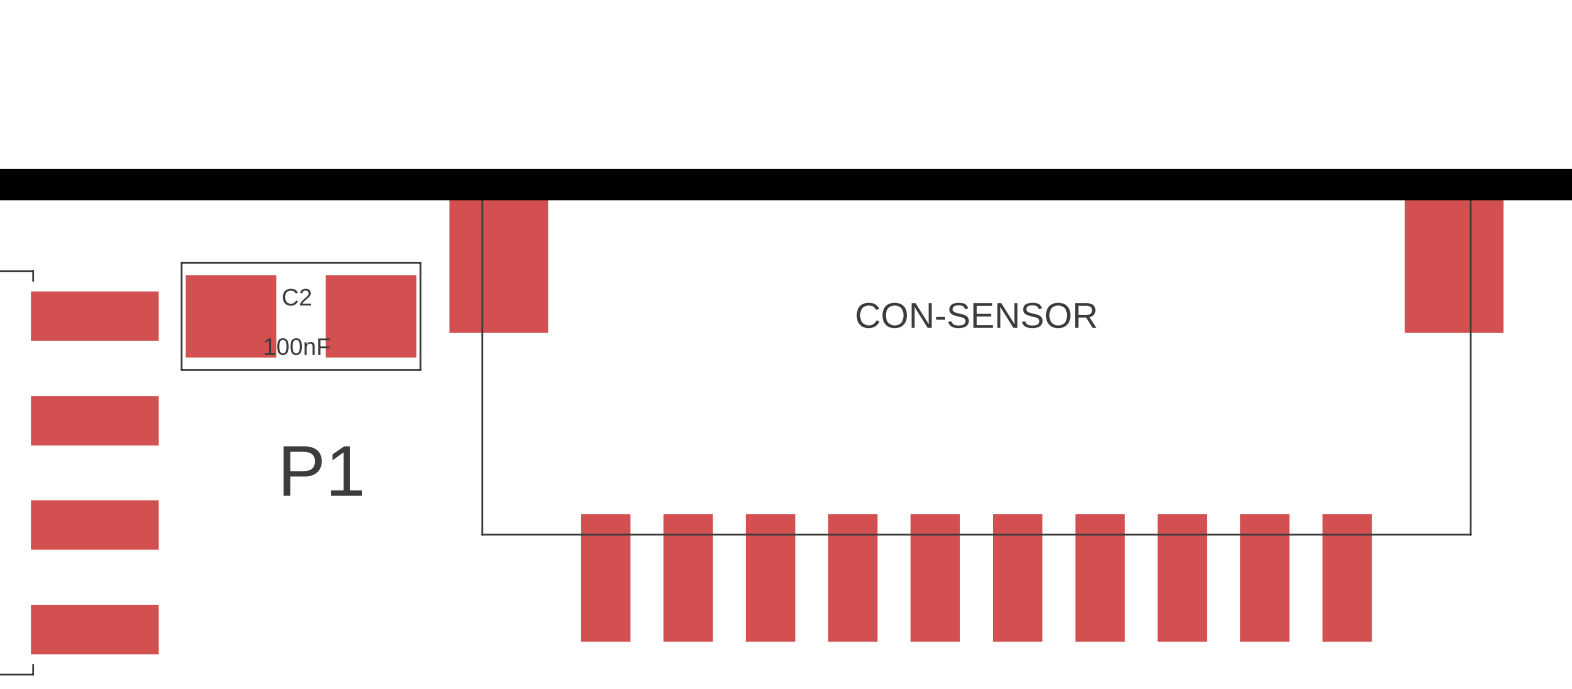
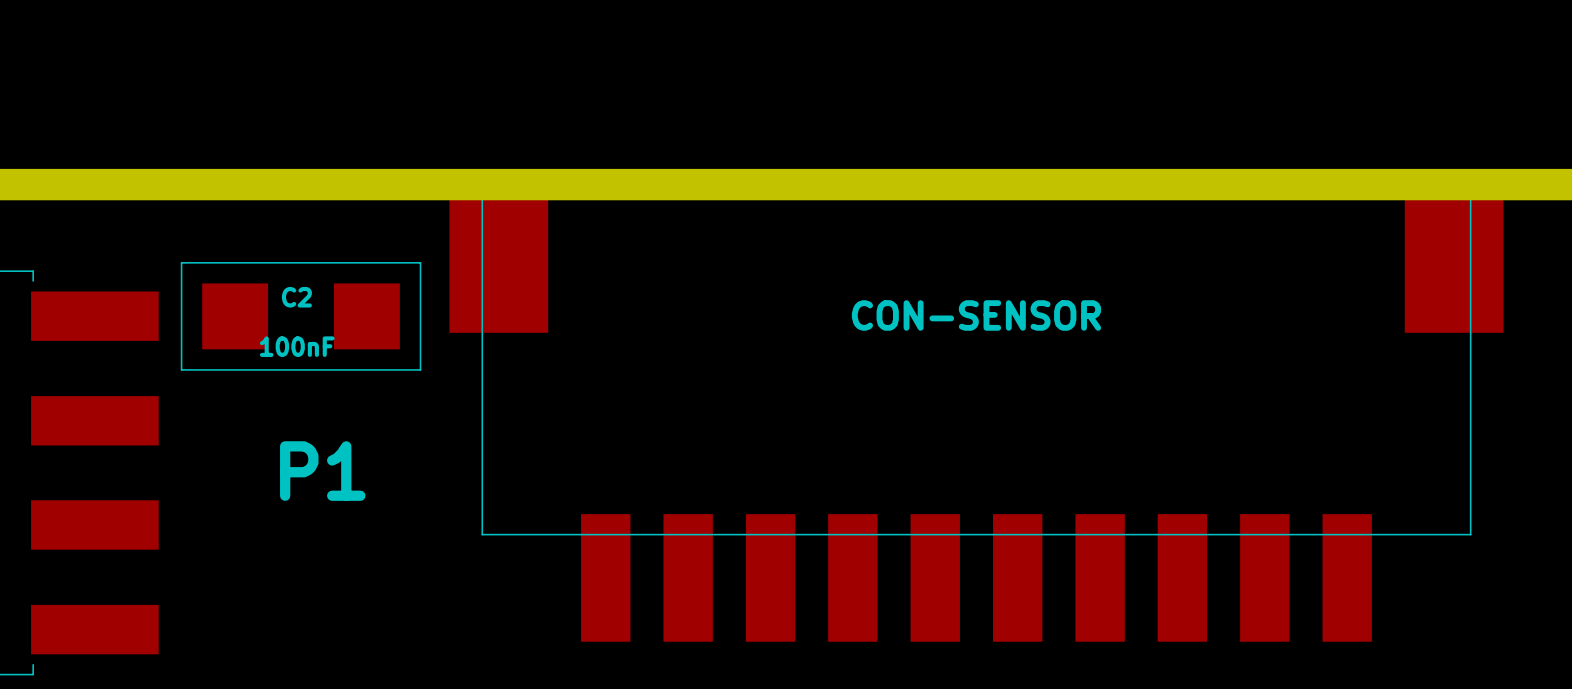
C2 footprint: [181, 262, 421, 370] -> [181, 262, 421, 370]

